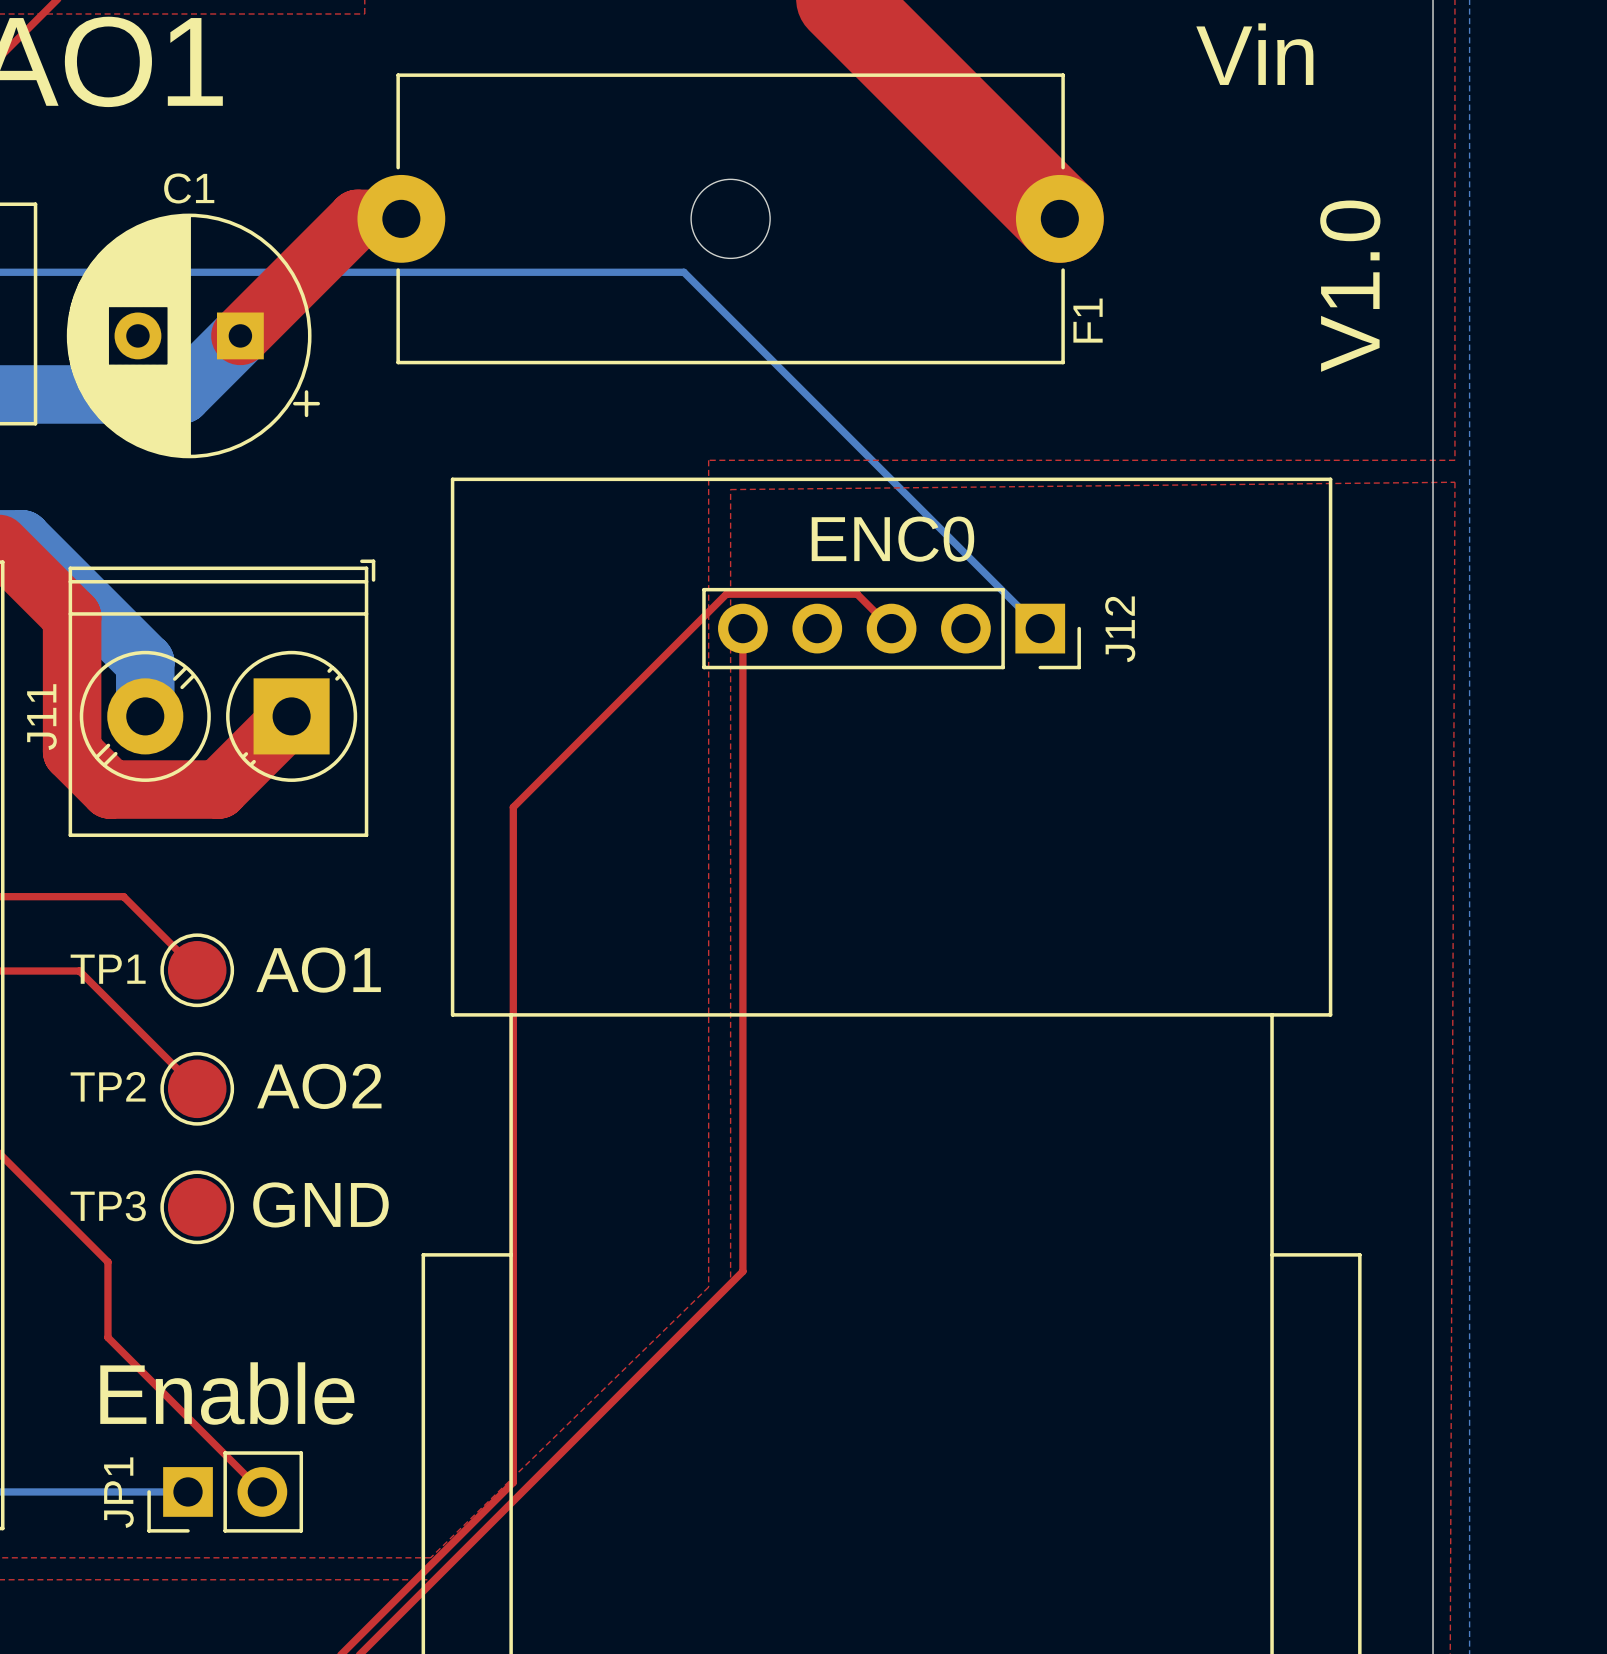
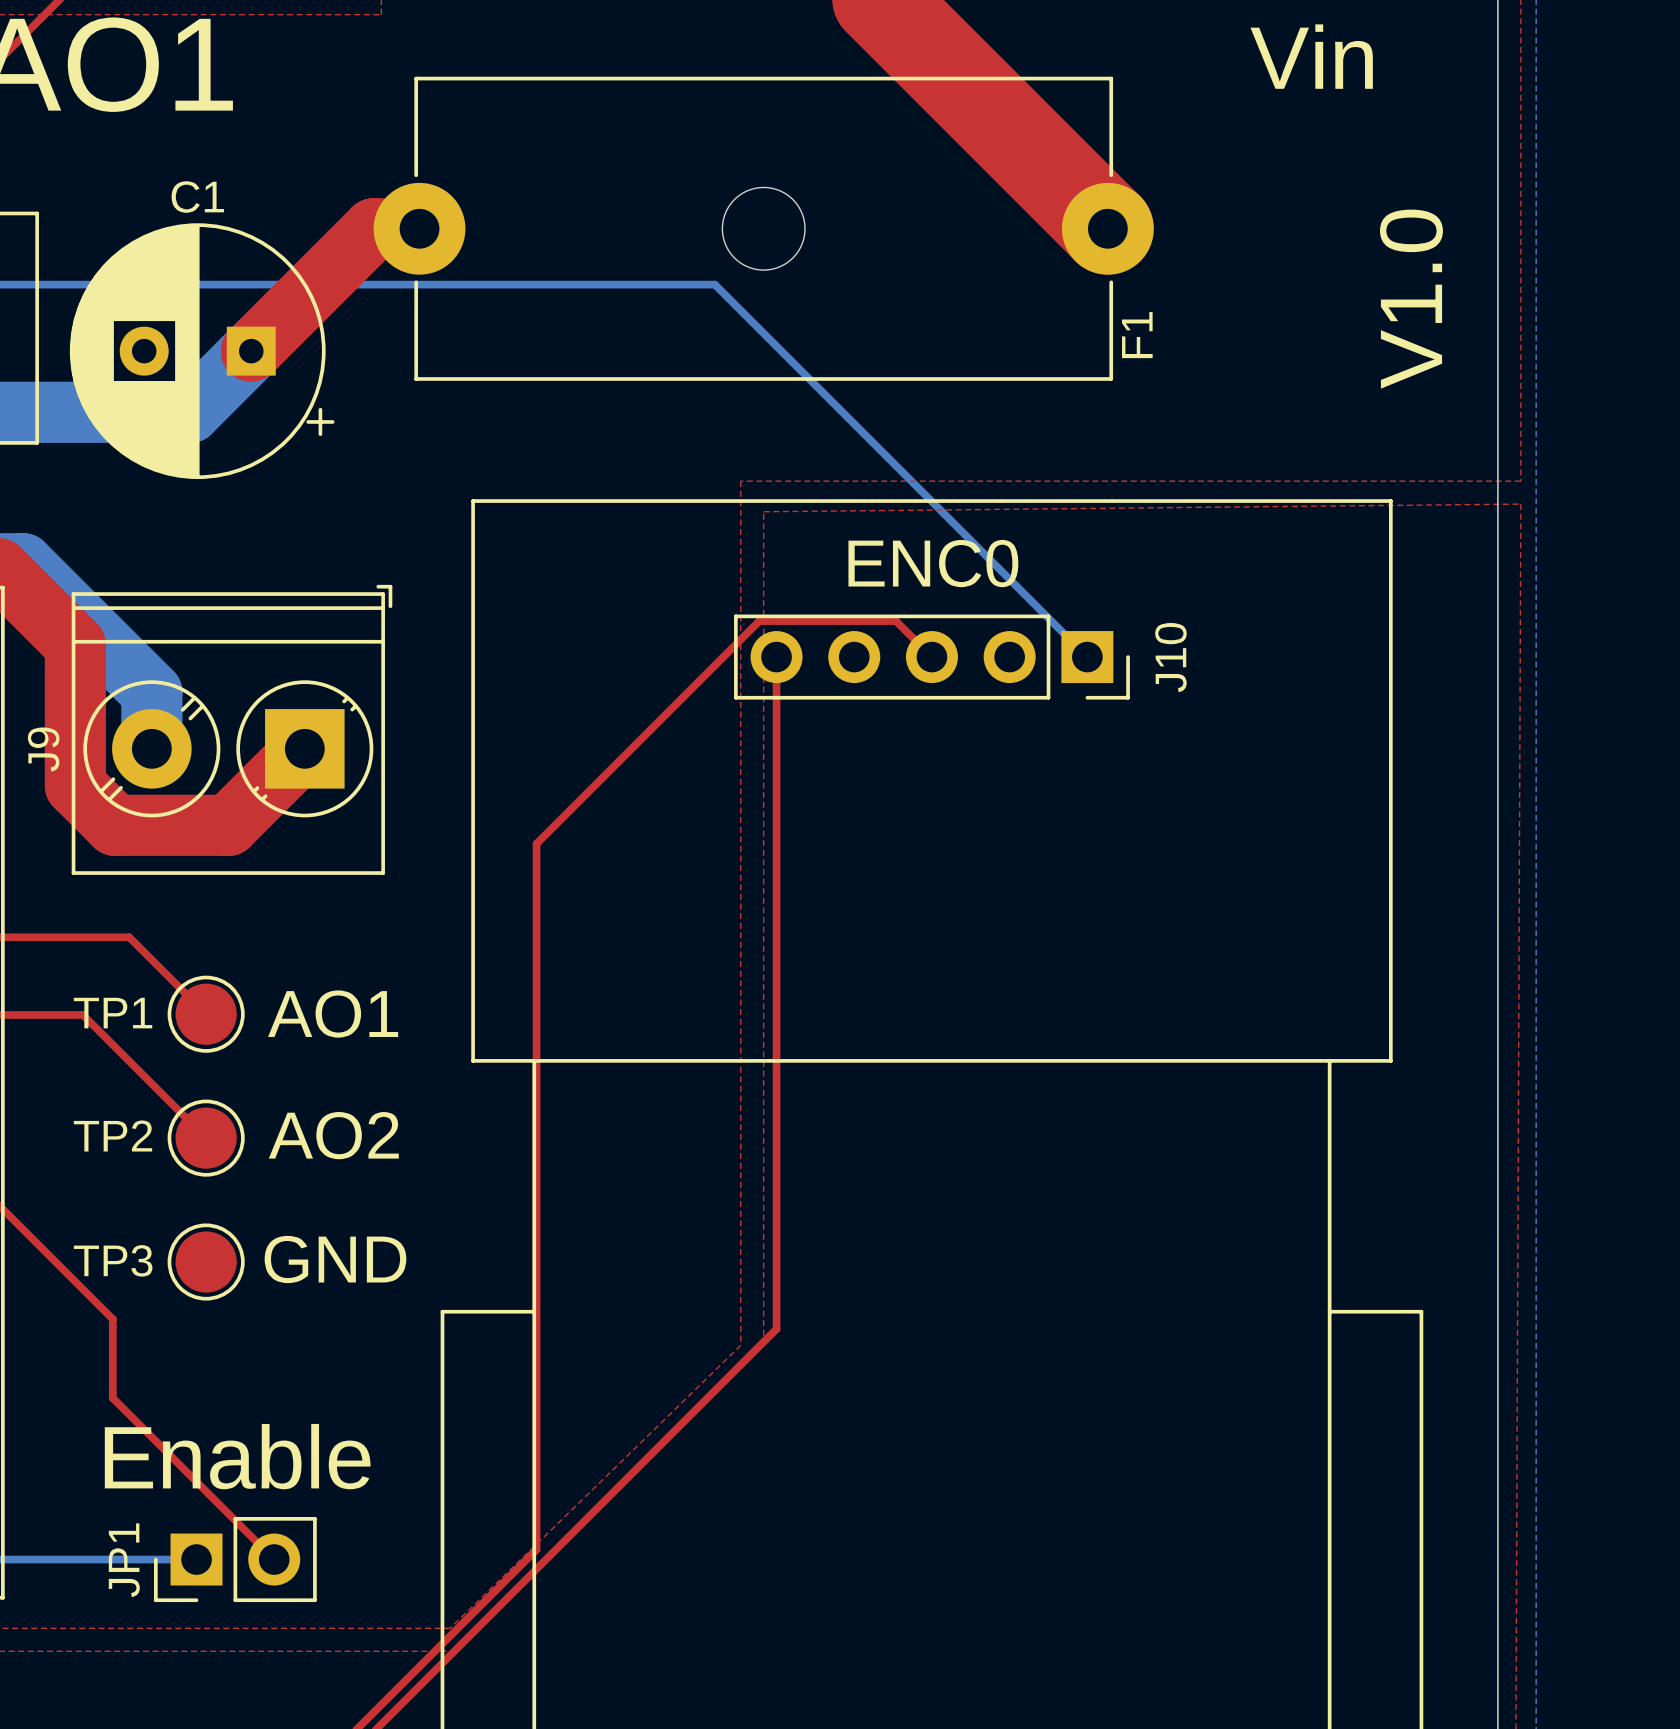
J12 name: J12 (1120, 629) -> J10 (1170, 657)
J11 name: J11 (41, 717) -> J9 (43, 749)

